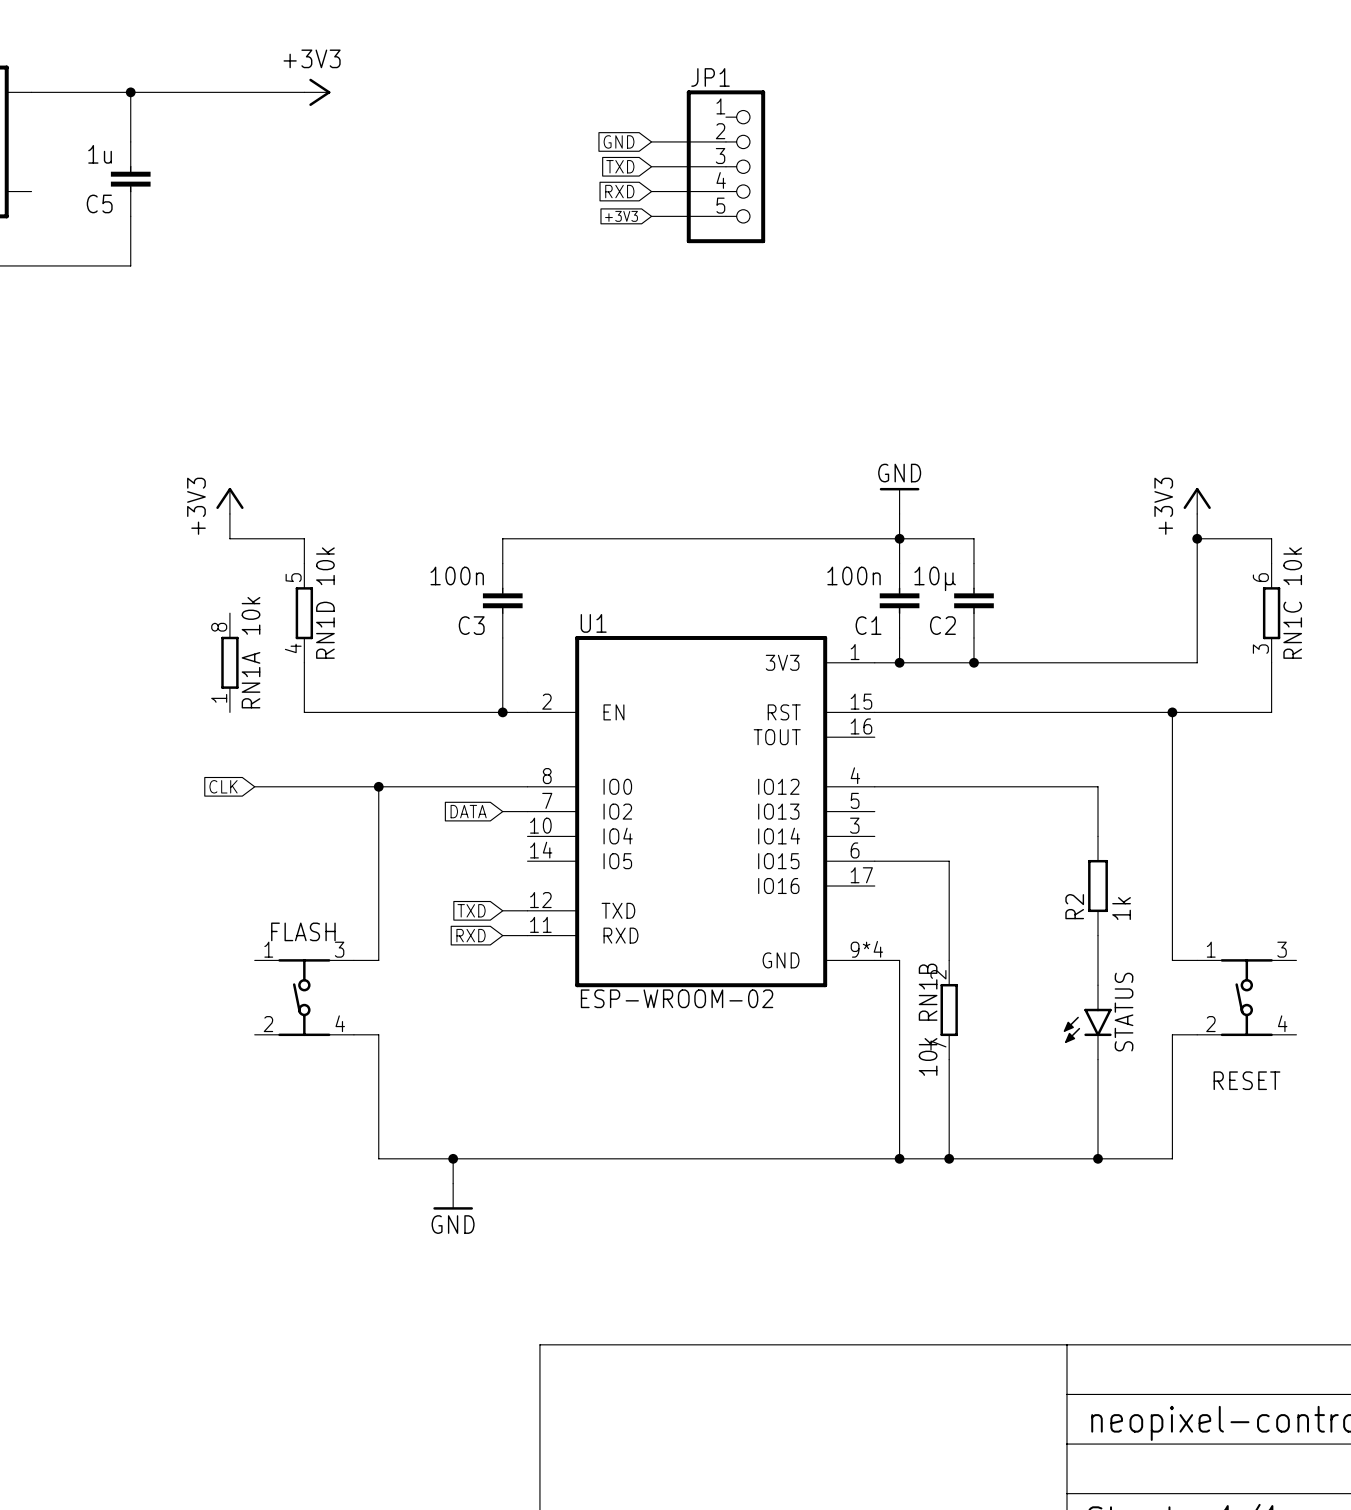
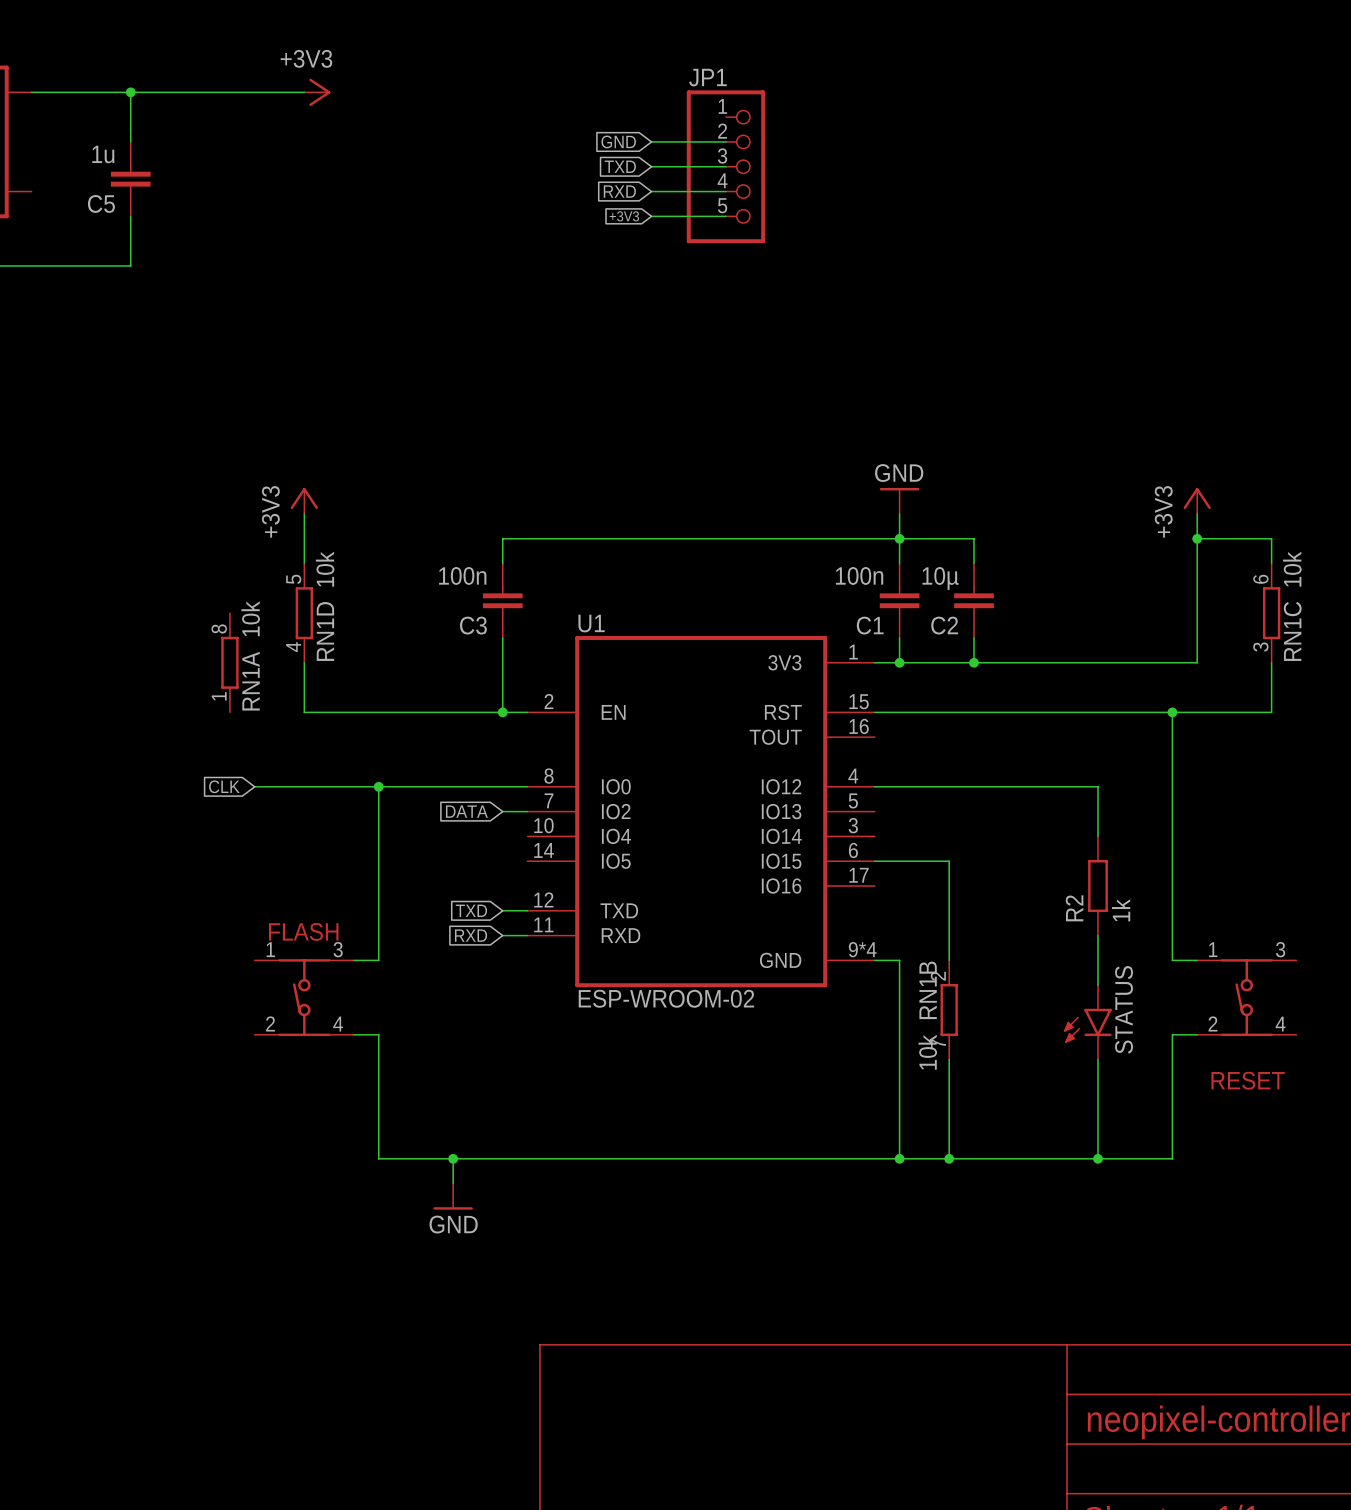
power symbol position: +3V3 (229, 500) -> +3V3 (304, 500)
wire: (229, 513) (229, 538) (304, 538) -> (304, 513) (304, 538)

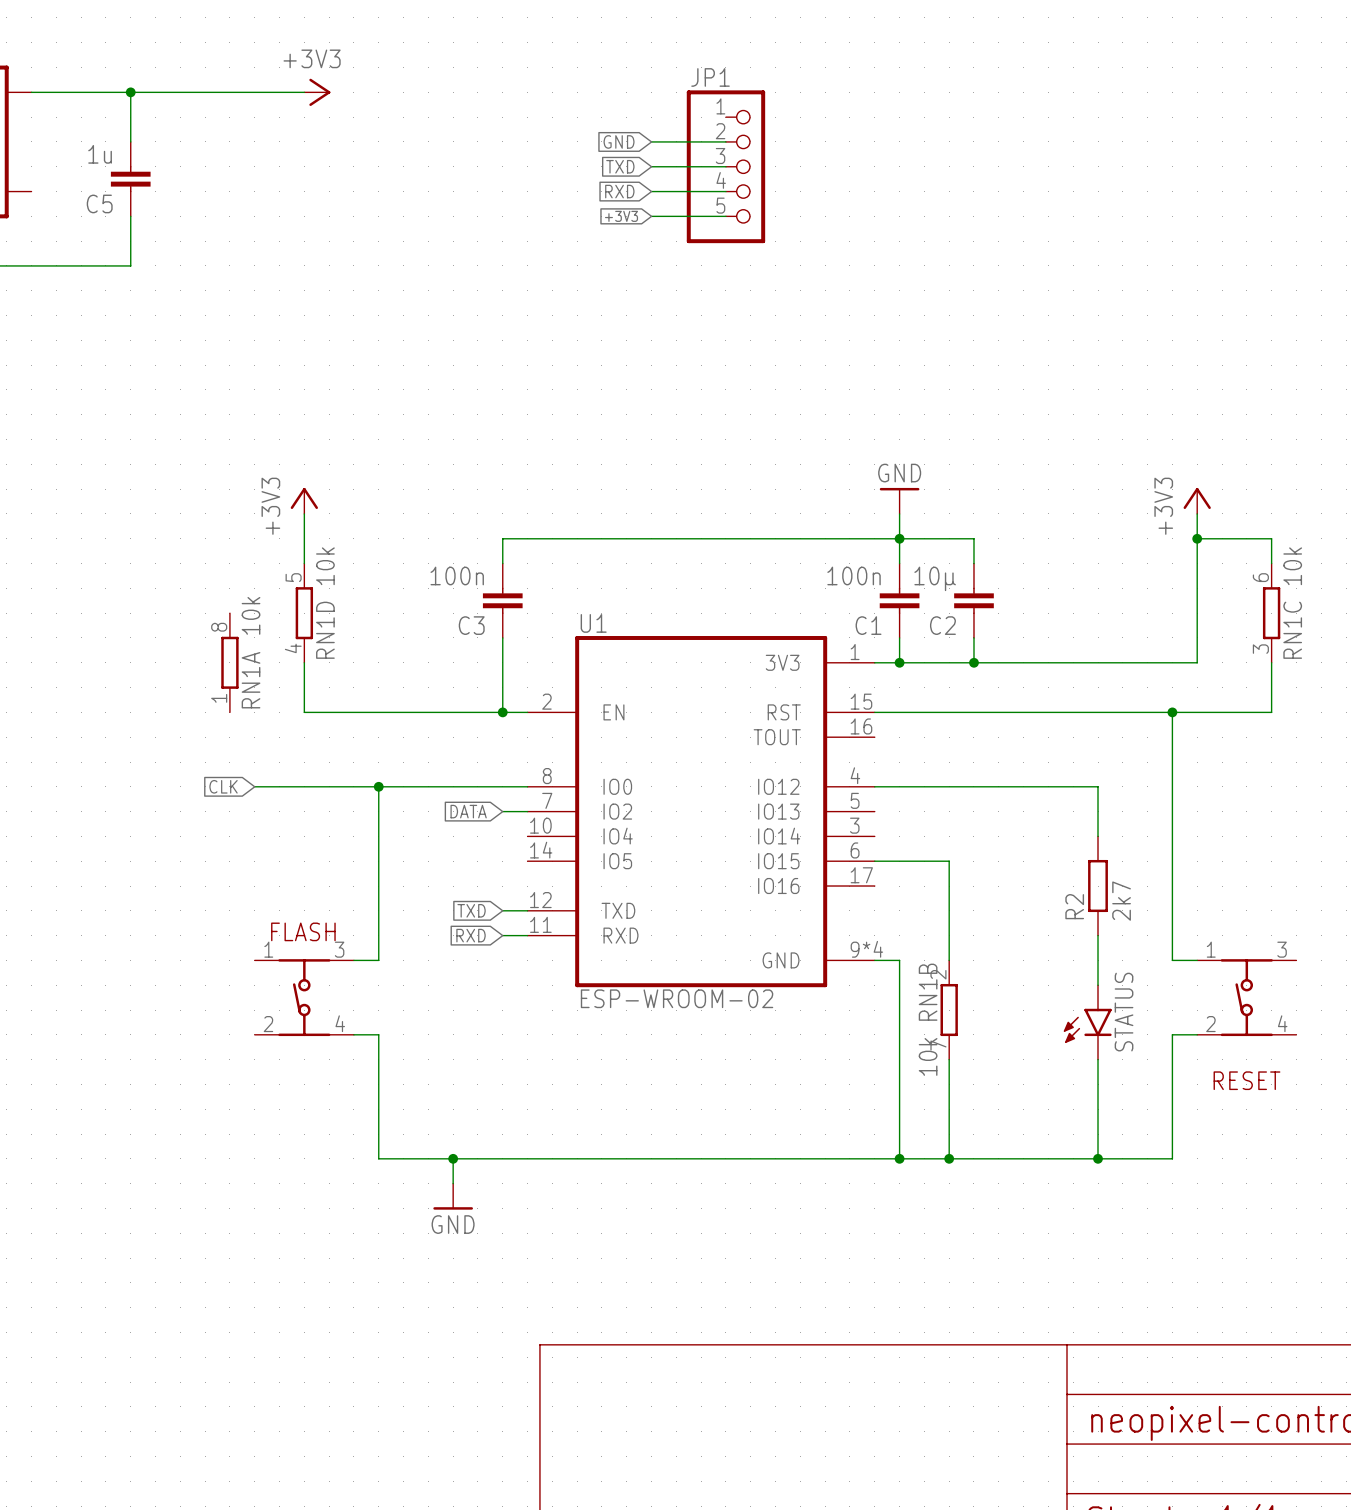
R2 value: 1k (1121, 910) -> 2k7 (1121, 901)

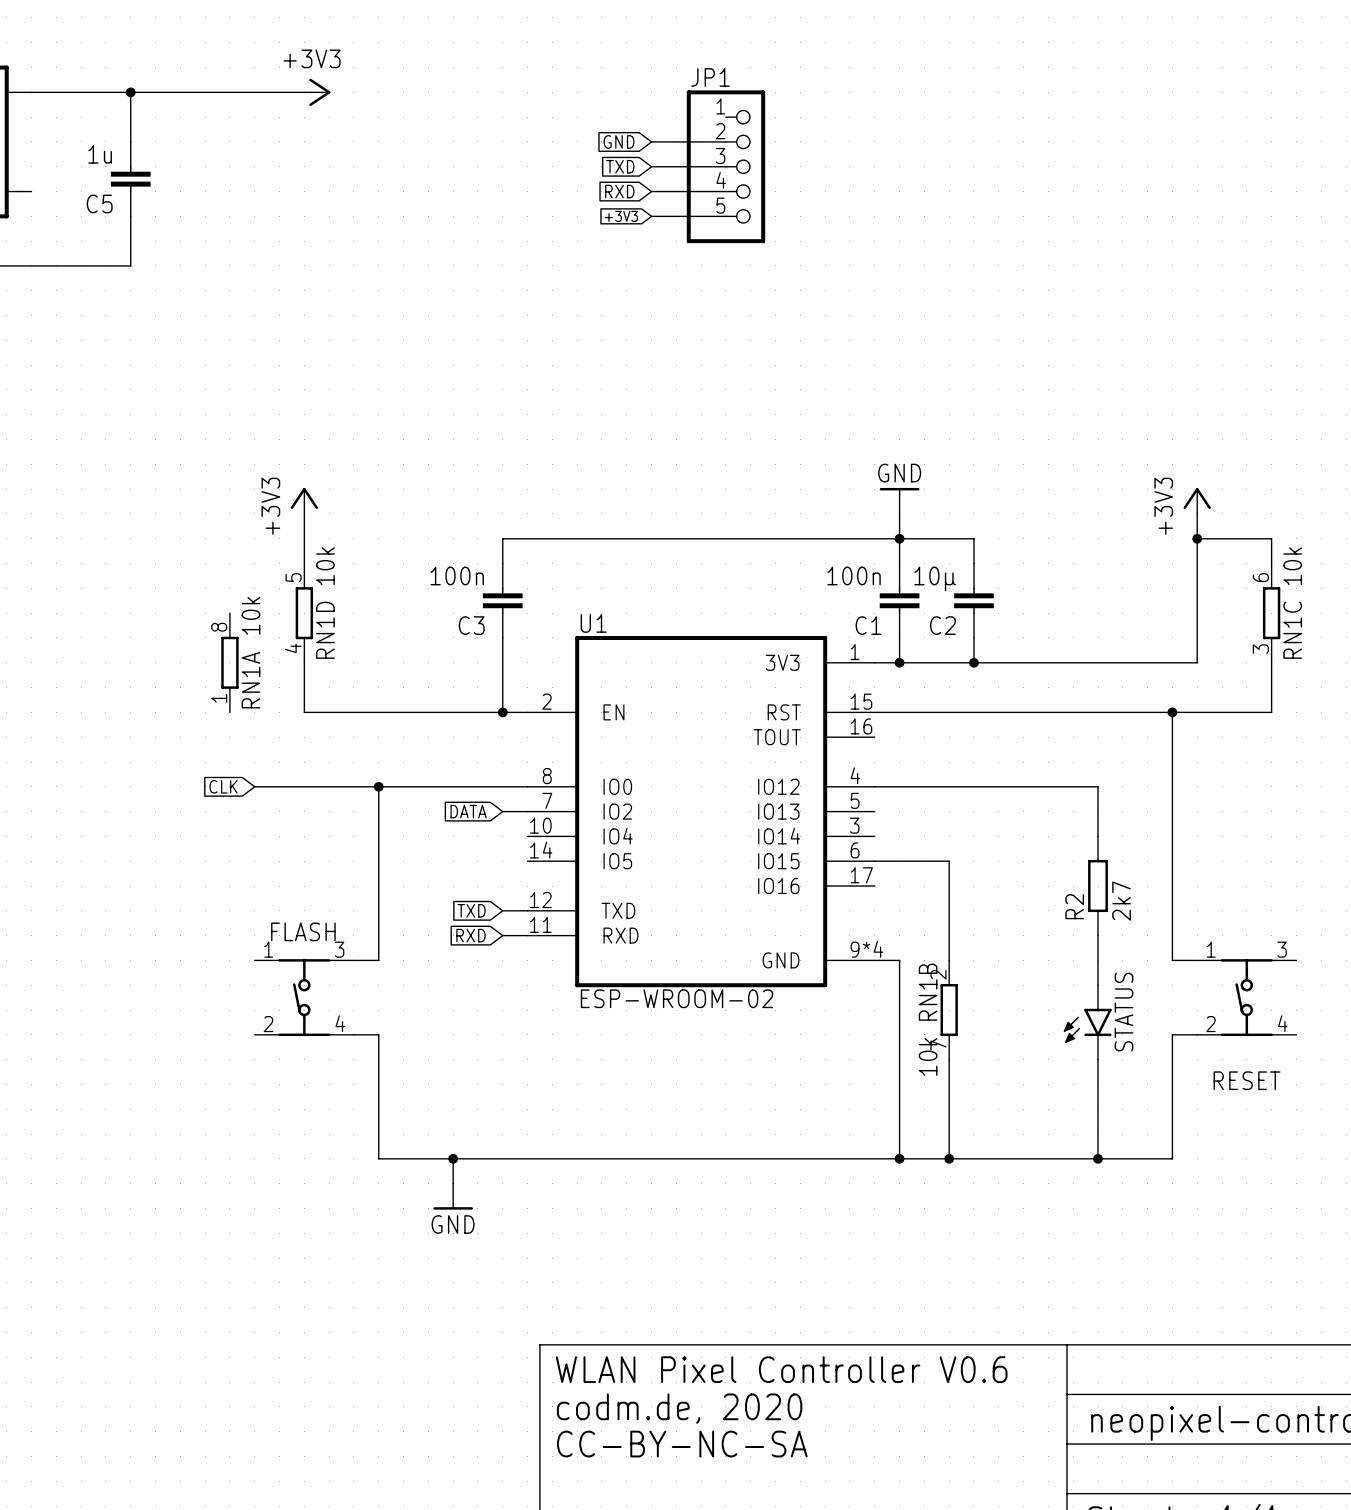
text: none -> WLAN Pixel Controller V0.6 (781, 1369)
text: none -> codm.de, 2020 (679, 1408)
text: none -> CC-BY-NC-SA (682, 1444)

